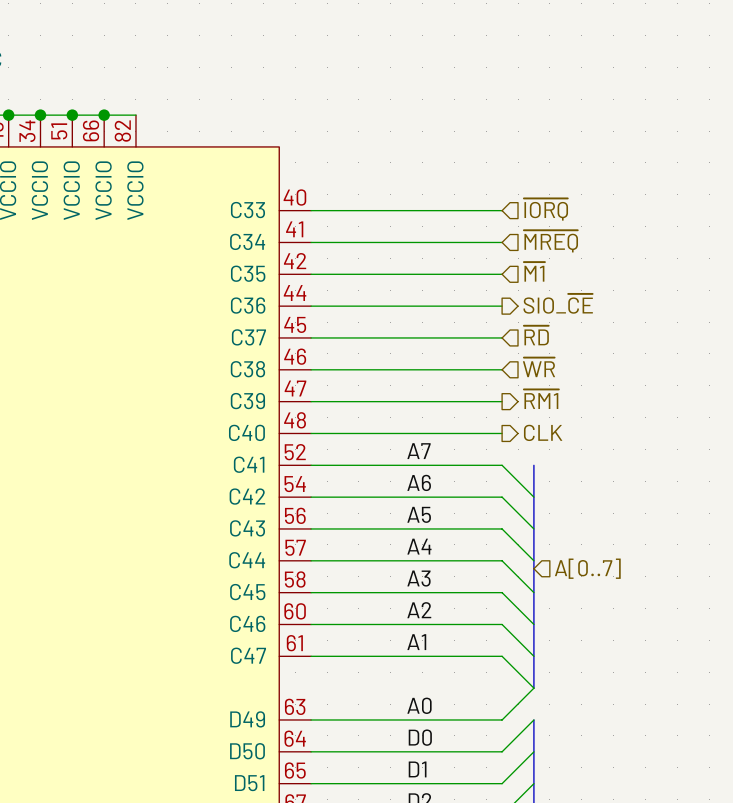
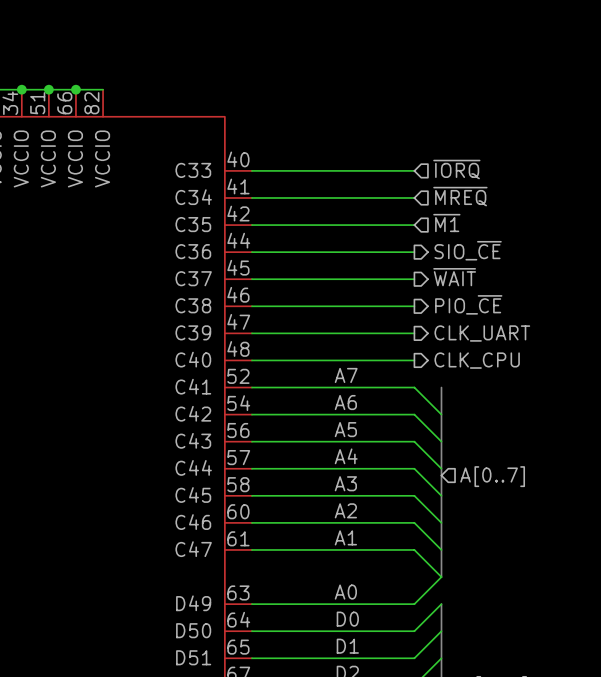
hierarchical label shape: input (536, 335) -> output (454, 277)
hierarchical label: ~{RD} (536, 335) -> ~{WAIT} (454, 277)
hierarchical label shape: input (538, 367) -> output (468, 304)
hierarchical label: ~{WR} (538, 367) -> PIO_~{CE} (468, 304)
hierarchical label: ~{RM1} (541, 399) -> CLK_UART (482, 333)
hierarchical label: CLK (543, 432) -> CLK_CPU (477, 360)

